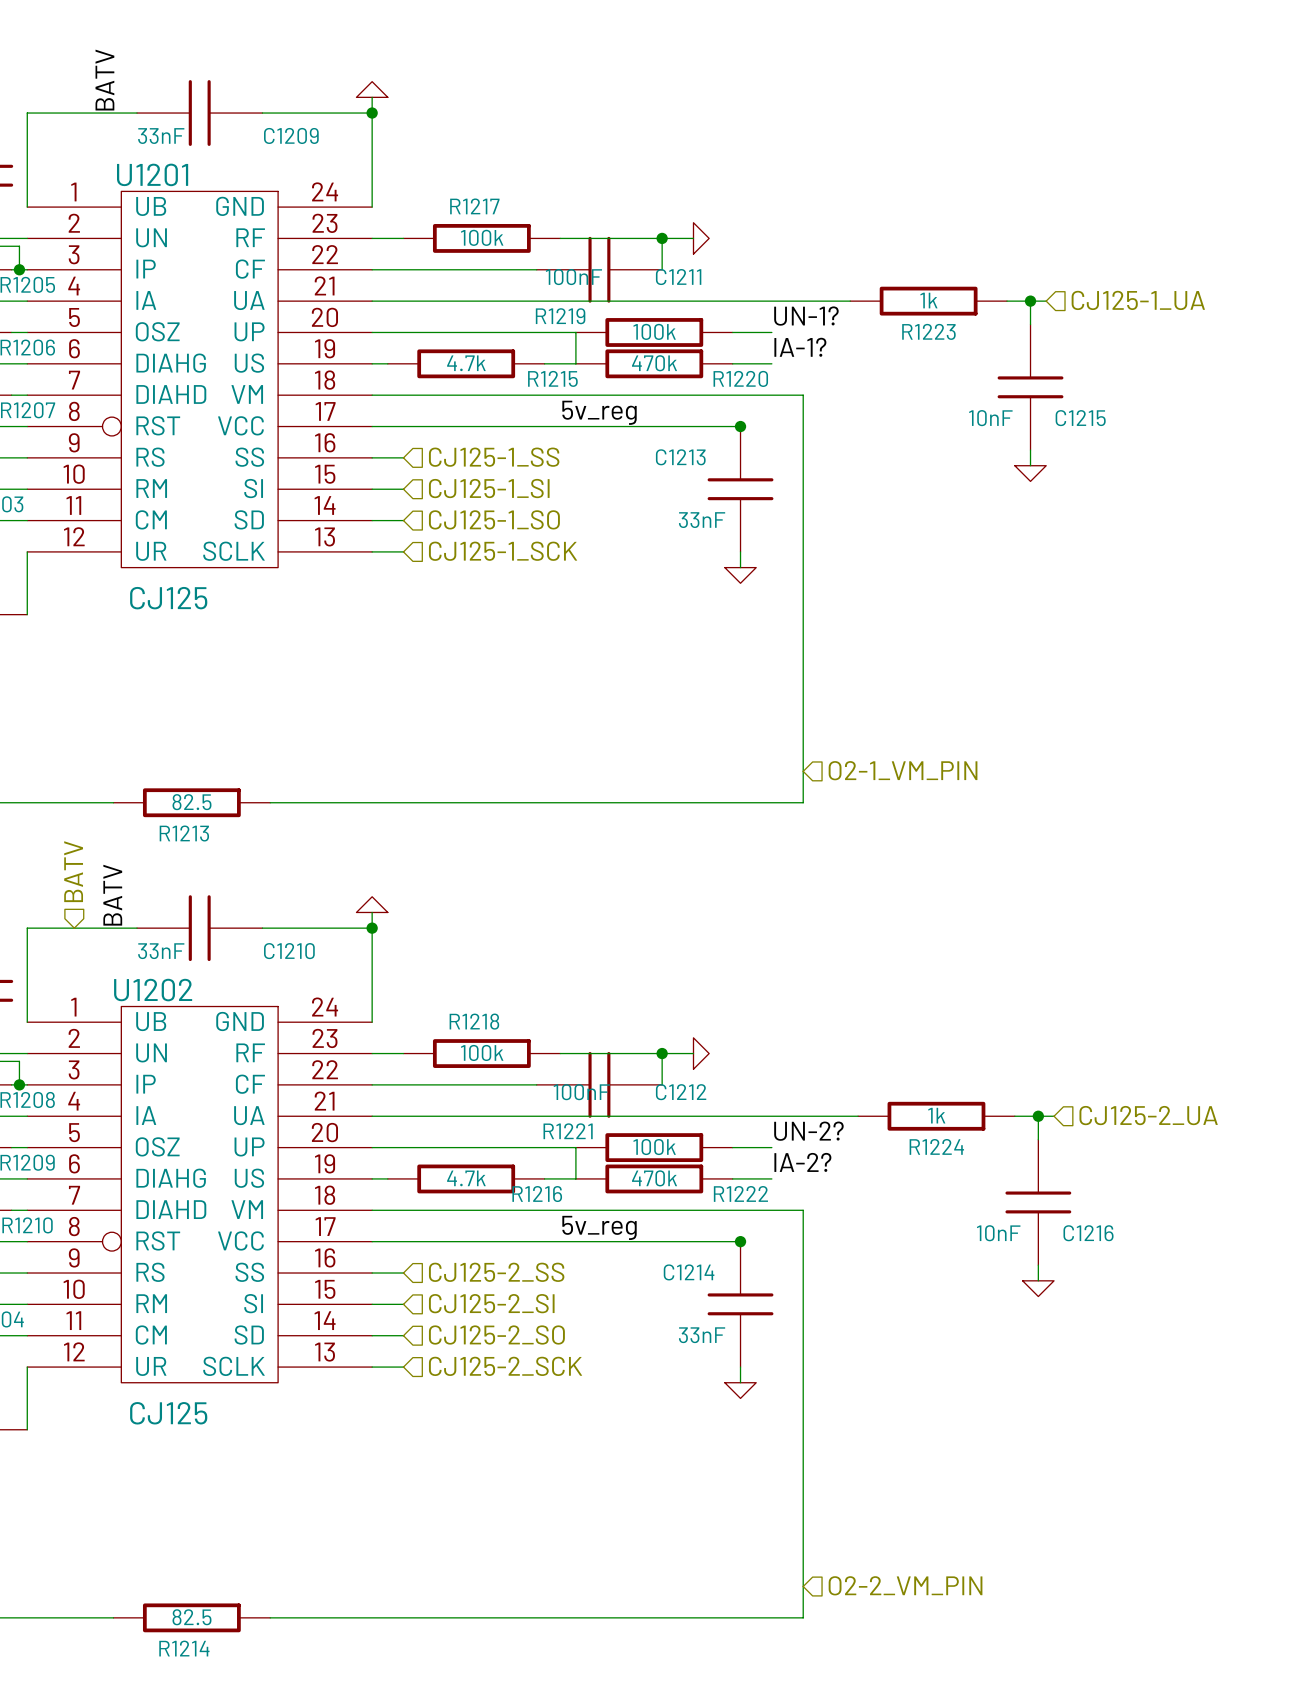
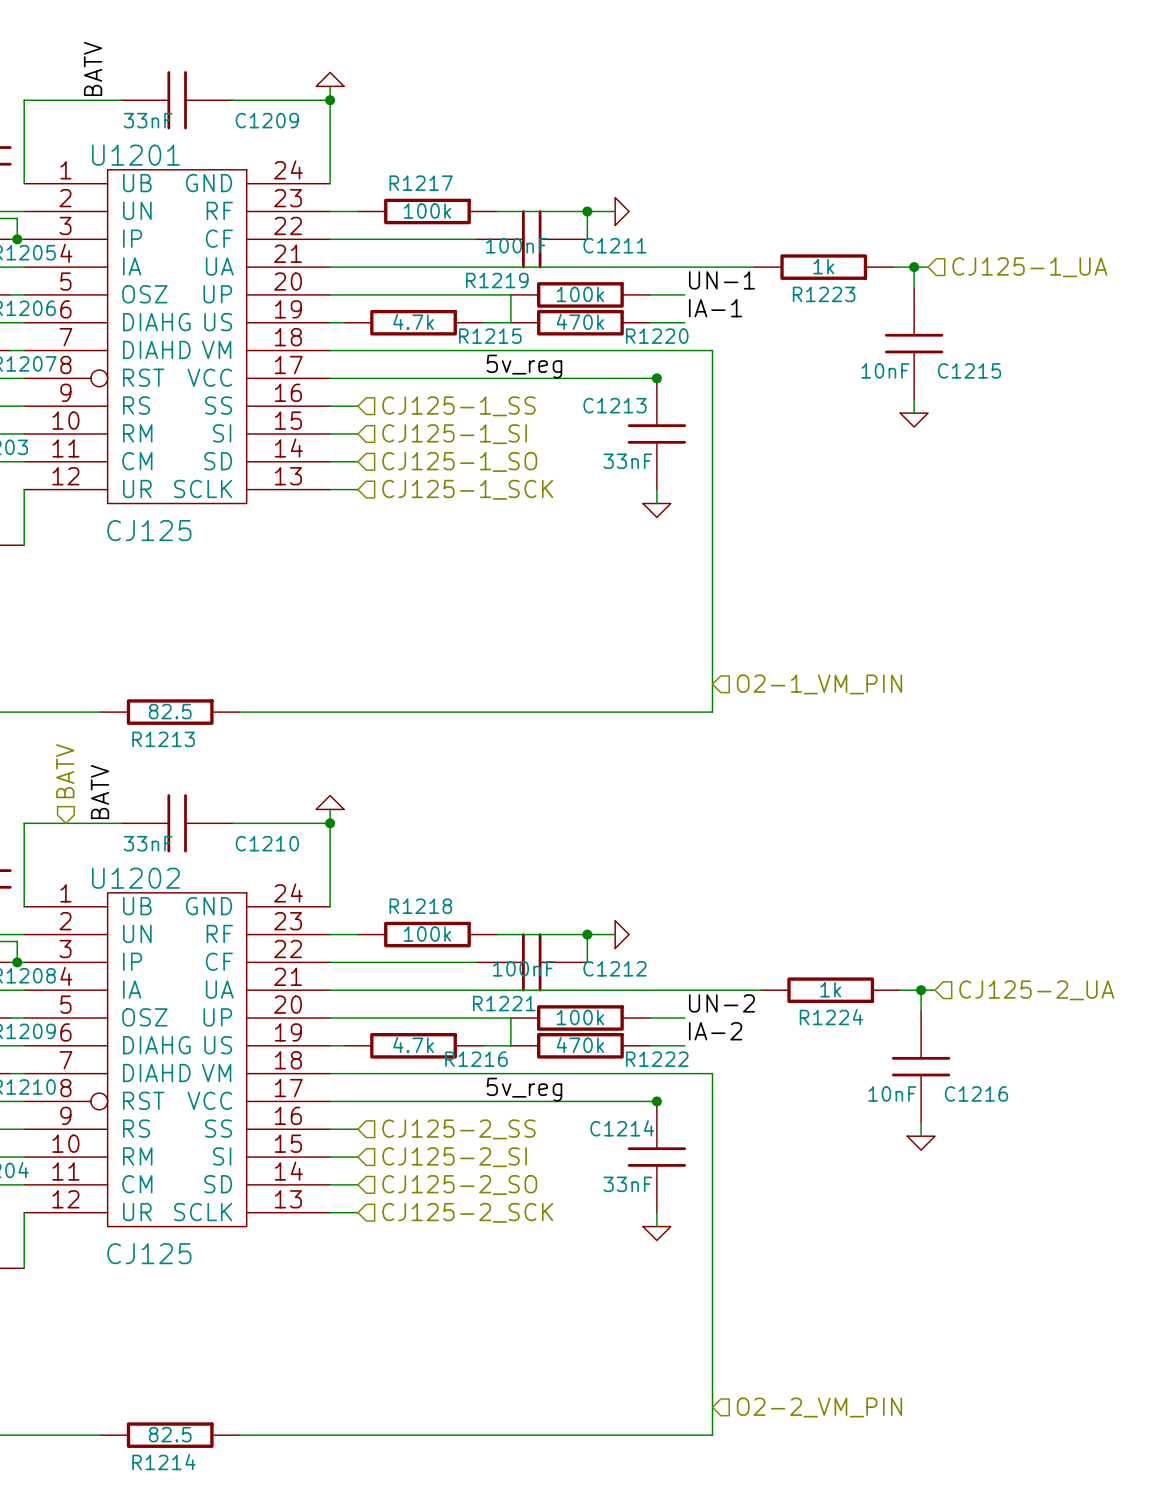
label: UN-1? (806, 316) -> UN-1 (721, 280)
label: IA-1? (800, 347) -> IA-1 (715, 308)
label: UN-2? (808, 1131) -> UN-2 (721, 1003)
label: IA-2? (802, 1162) -> IA-2 (715, 1031)

